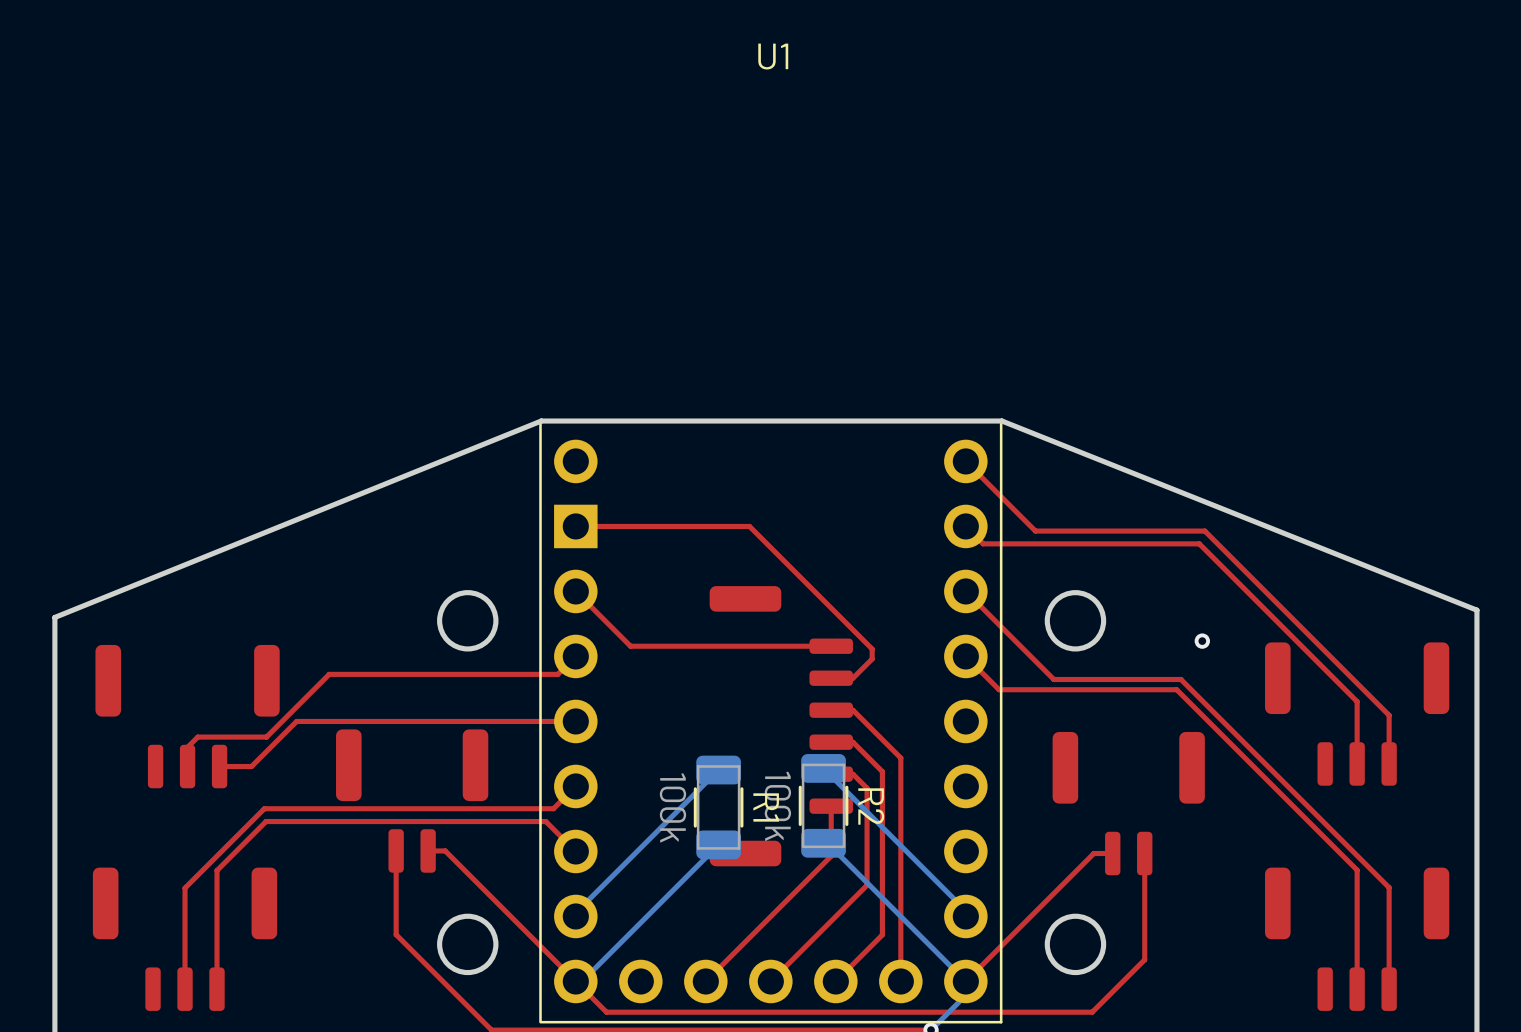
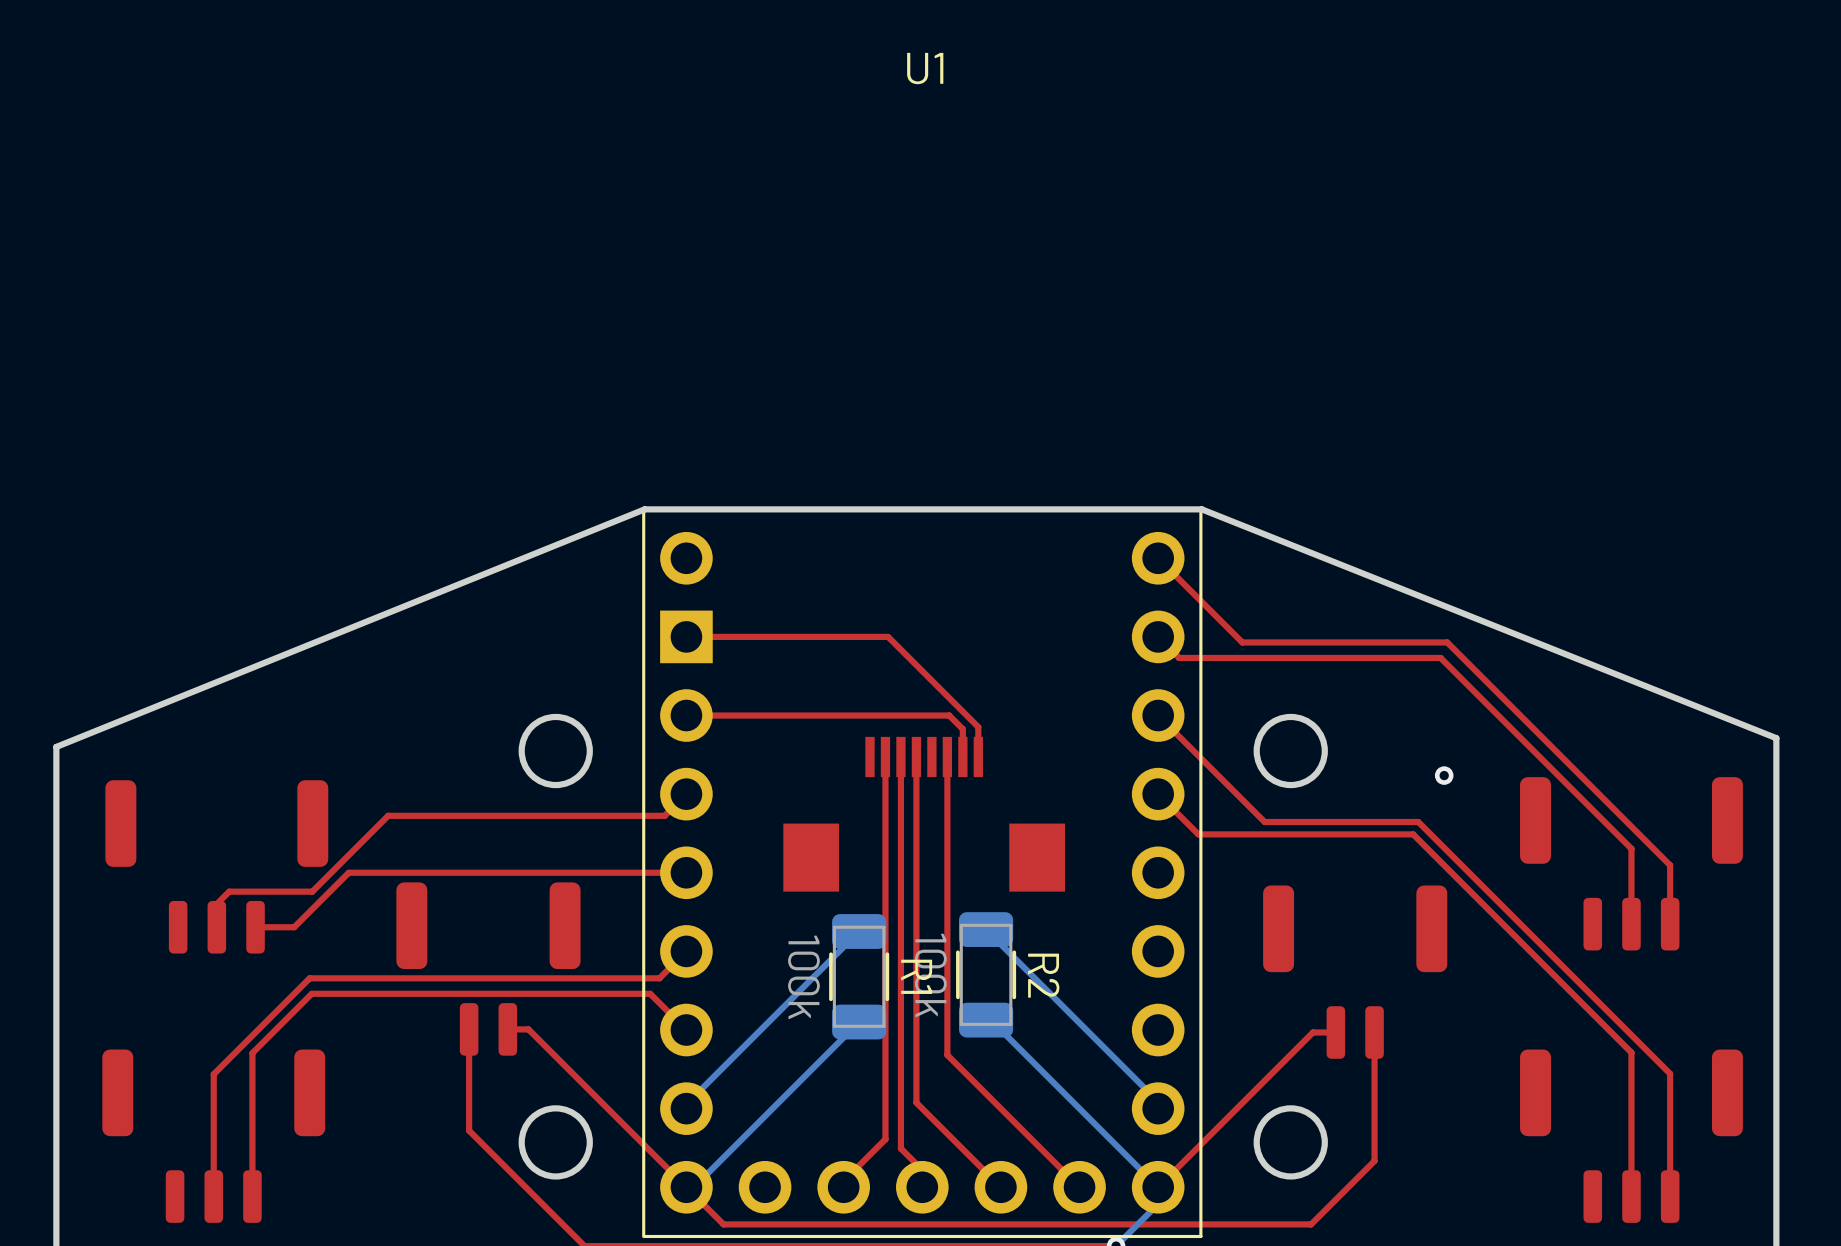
top track: (742, 526) (749, 526) (872, 649) (872, 659) (852, 678) (831, 678) -> (888, 636) (978, 727) (978, 757)
top track: (575, 591) (630, 646) (831, 646) -> (686, 715) (949, 715) (962, 729) (962, 757)
part: none -> (924, 814)
top track: (831, 710) (852, 710) (900, 758) (900, 981) -> (947, 757) (947, 1055) (1079, 1187)
part: (781, 726) -> none
top track: (831, 742) (852, 742) (882, 771) (882, 934) (835, 981) -> (916, 757) (916, 1102) (1000, 1187)
top track: (831, 774) (852, 774) (867, 788) (867, 885) (770, 981) -> (900, 757) (900, 1148) (922, 1169) (922, 1187)
top track: (831, 806) (831, 856) (705, 981) -> (885, 757) (885, 1139) (843, 1181) (843, 1187)

